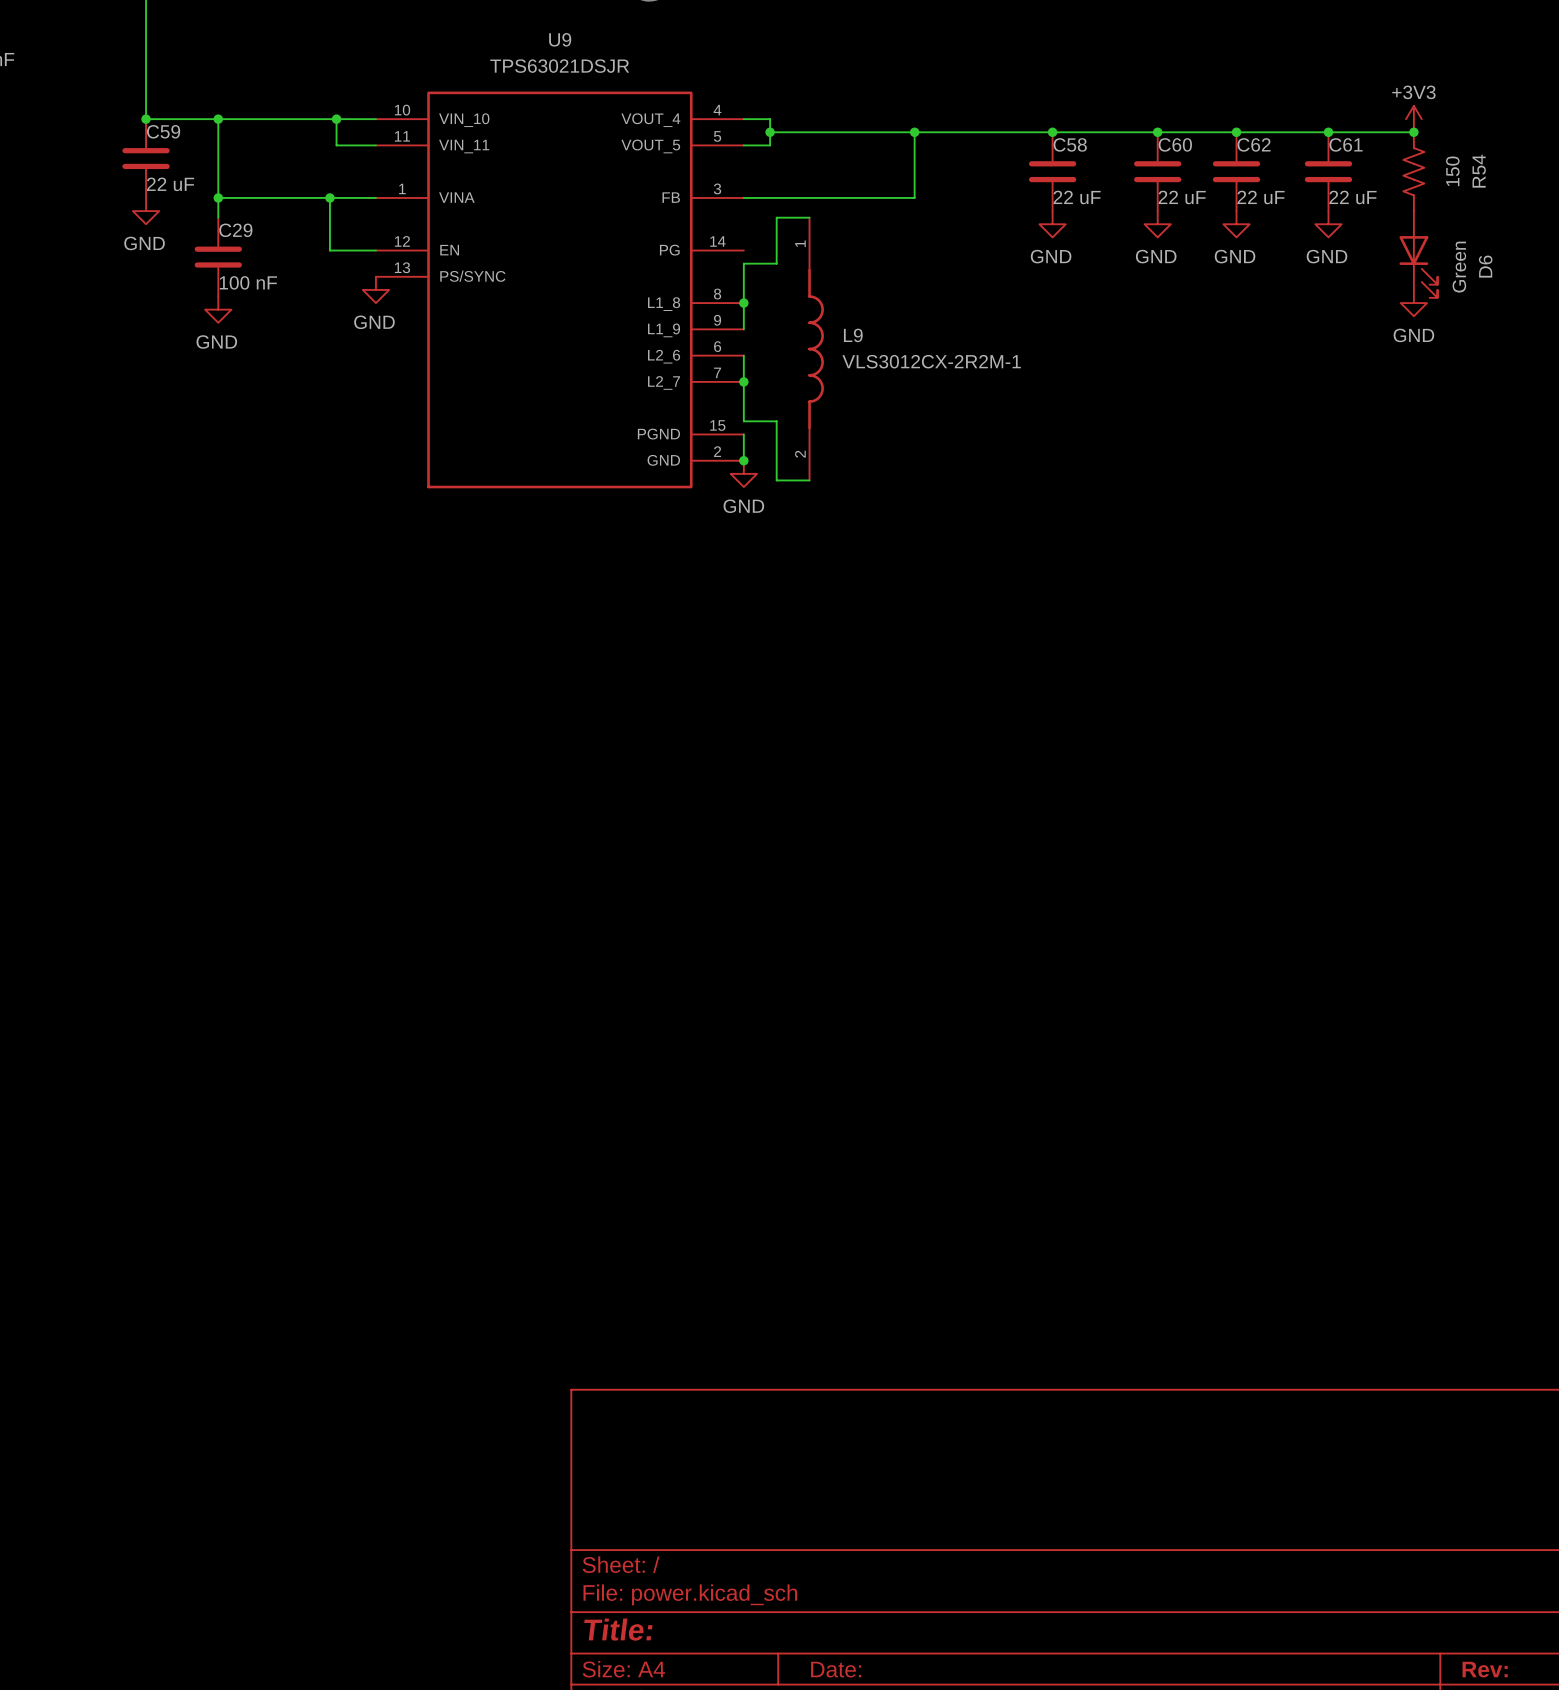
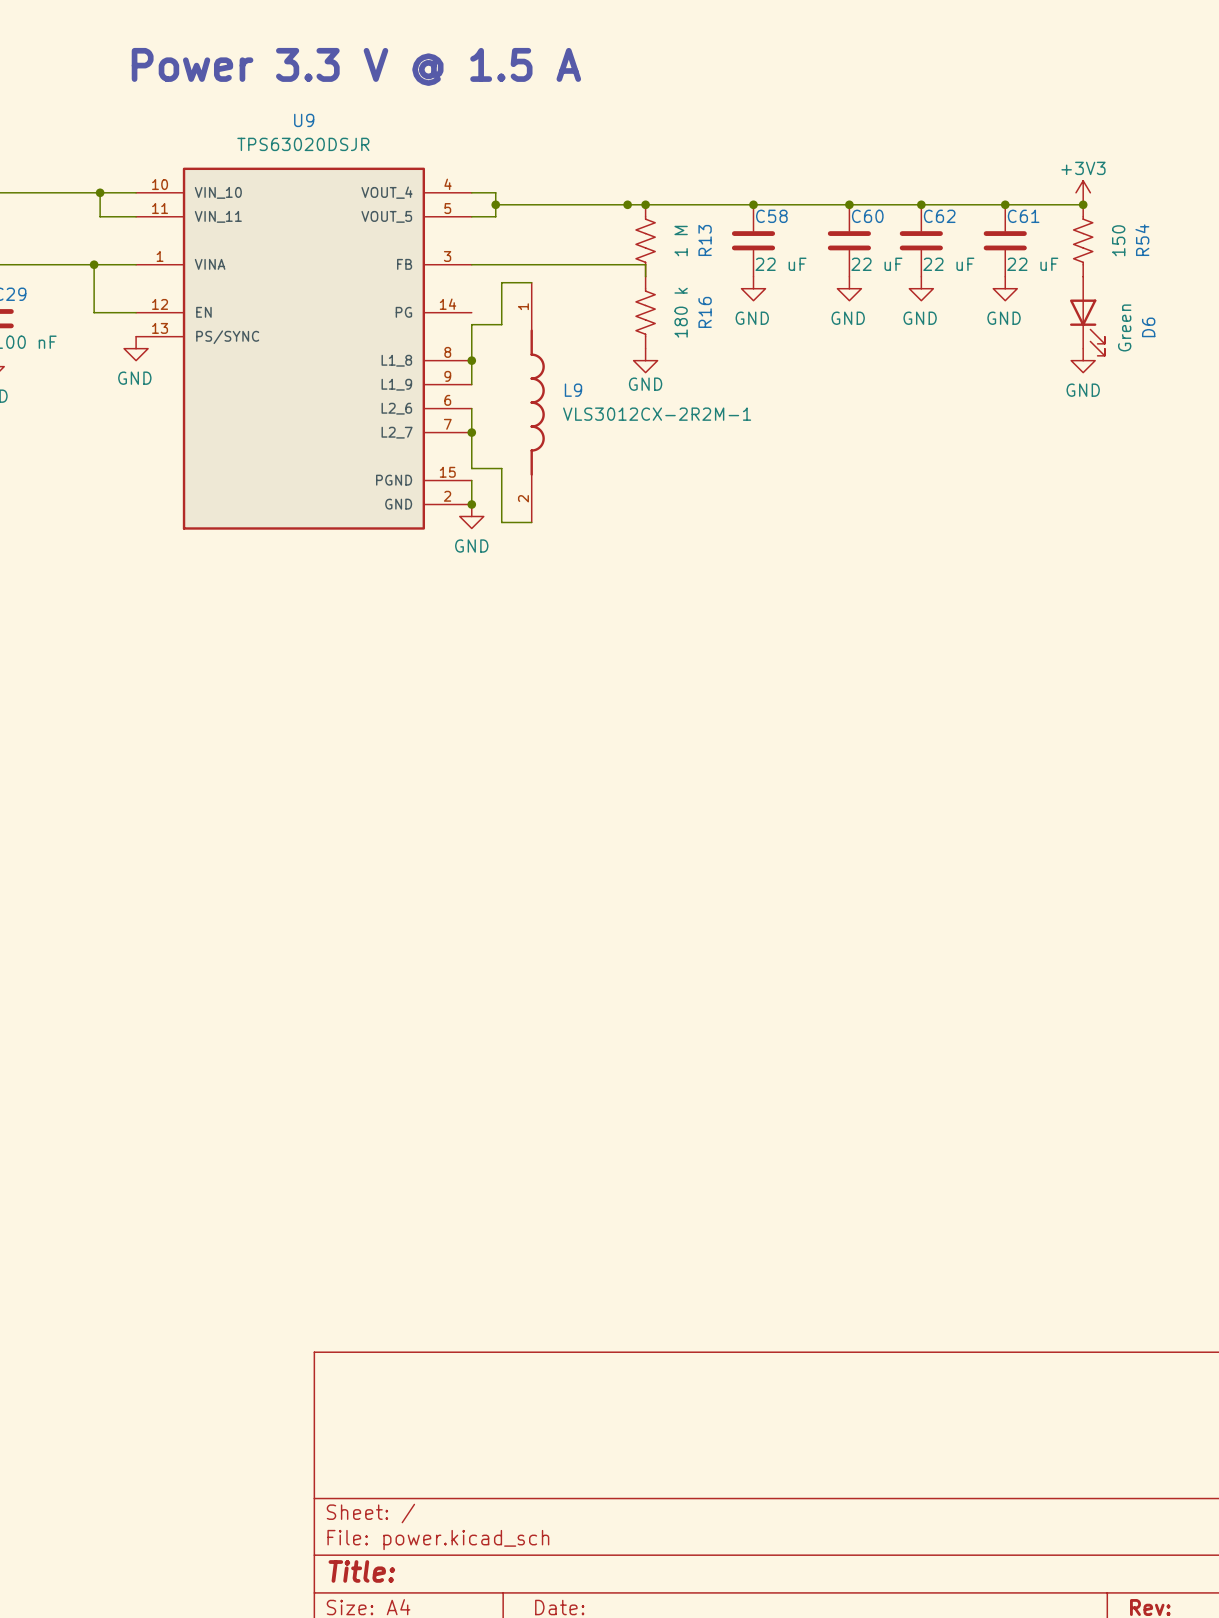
U9 value: TPS63021DSJR (559, 66) -> TPS63020DSJR (303, 144)
wire: (914, 132) (914, 197) -> (645, 276) (645, 264) (627, 264)
junction: none -> (645, 204)
R13: none -> 1 M (645, 240)
R16: none -> 180 k (645, 312)
power symbol: none -> GND (645, 360)

